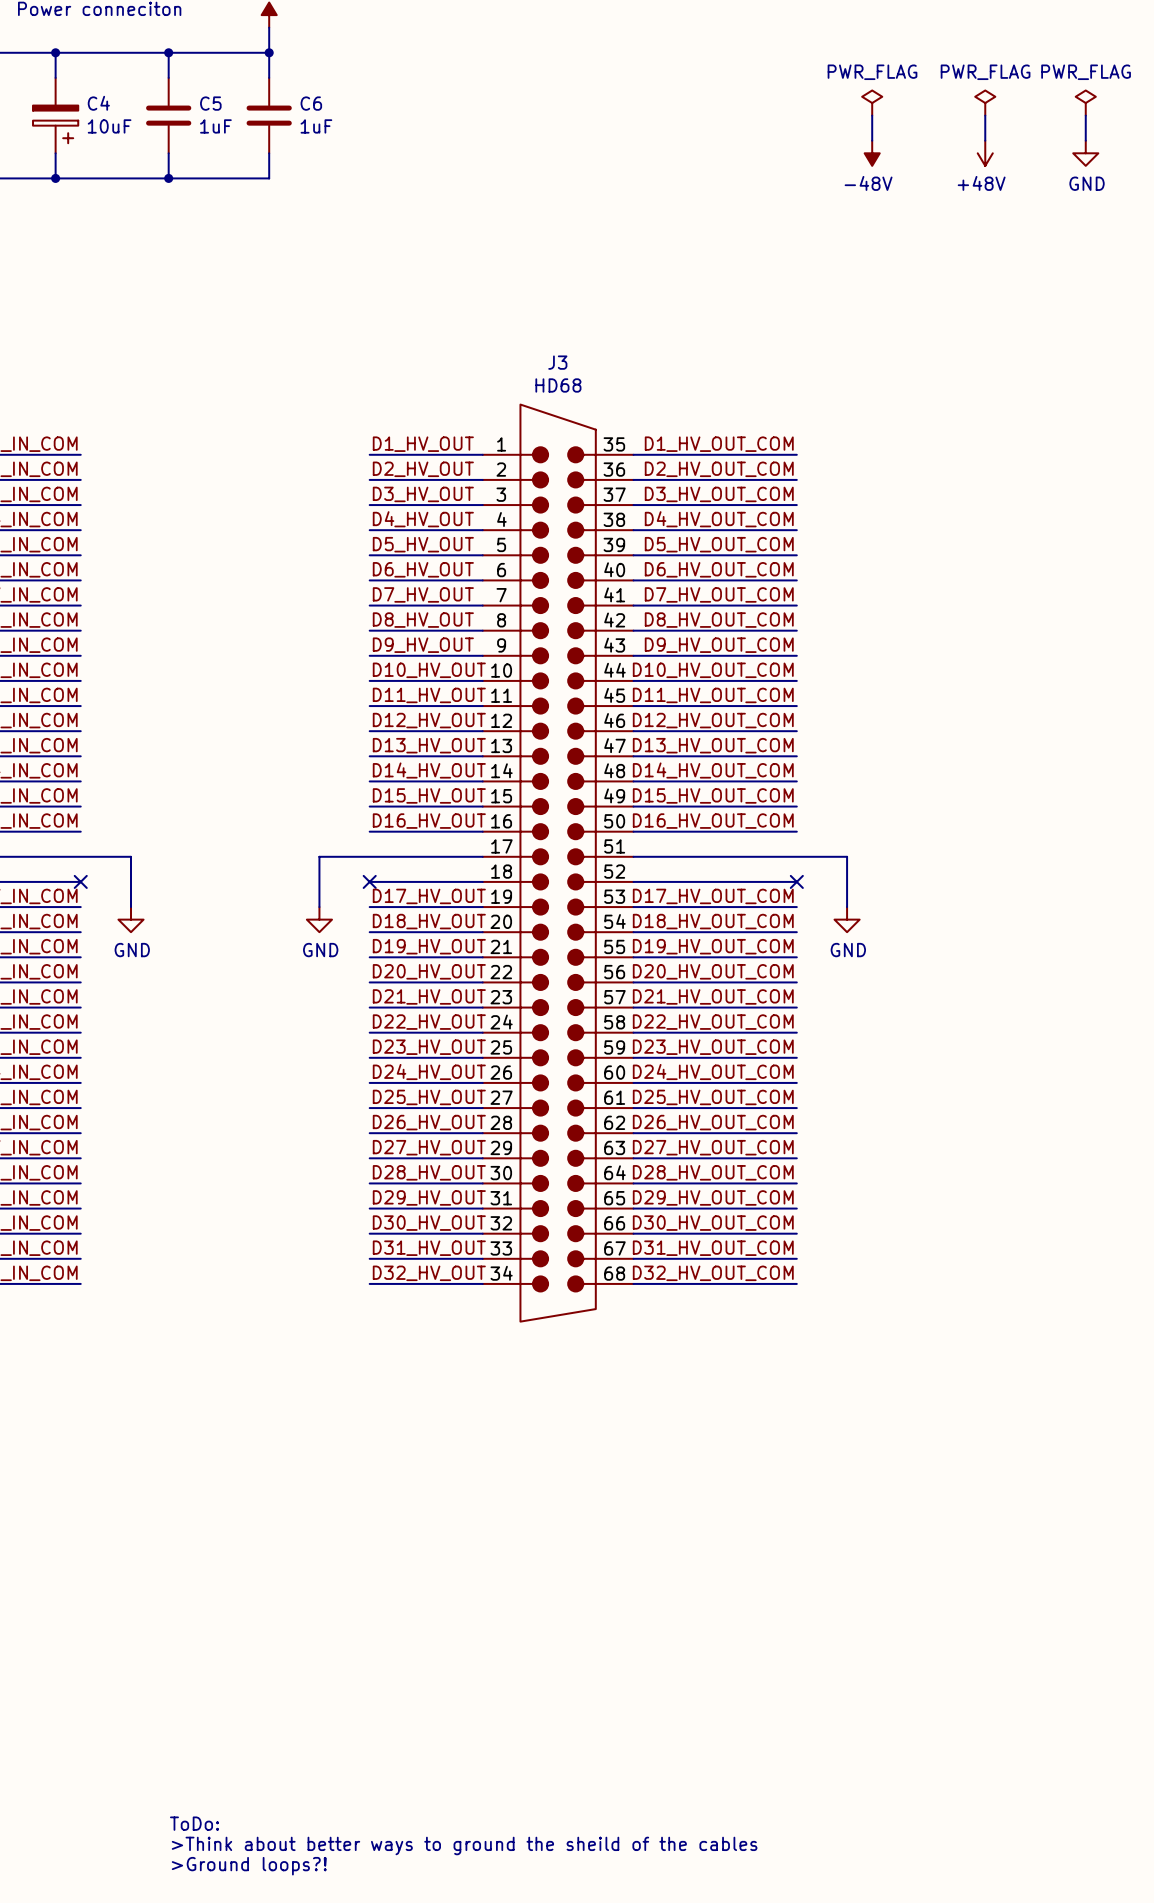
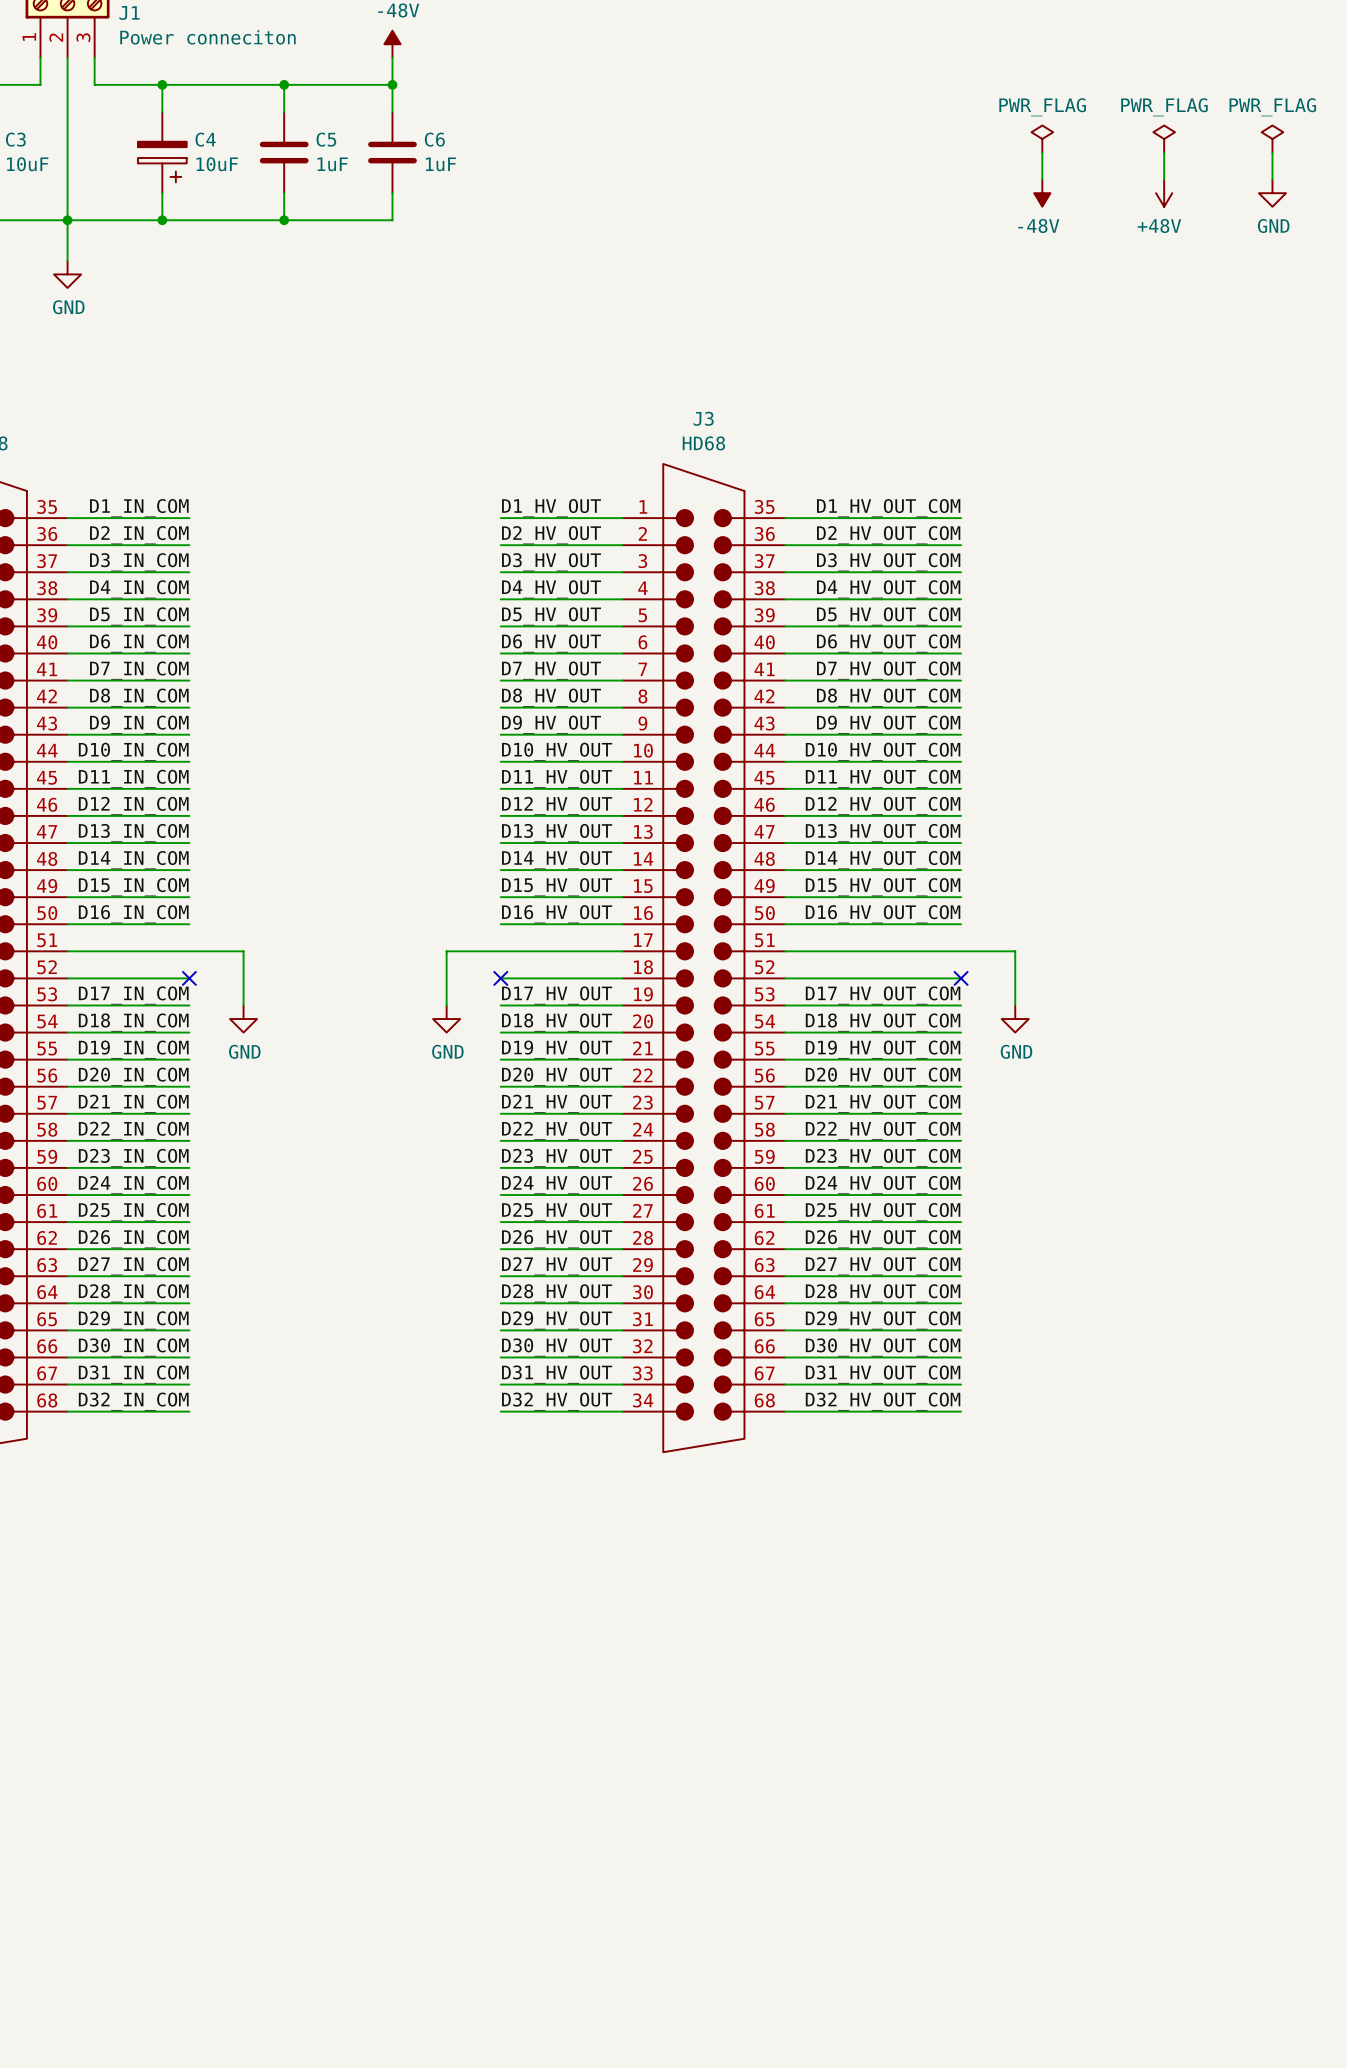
text: ToDo: (194, 1823) -> none
text: >Think about better ways to ground the sheild of the cables (464, 1845) -> none
text: >Ground loops?! (249, 1866) -> none

